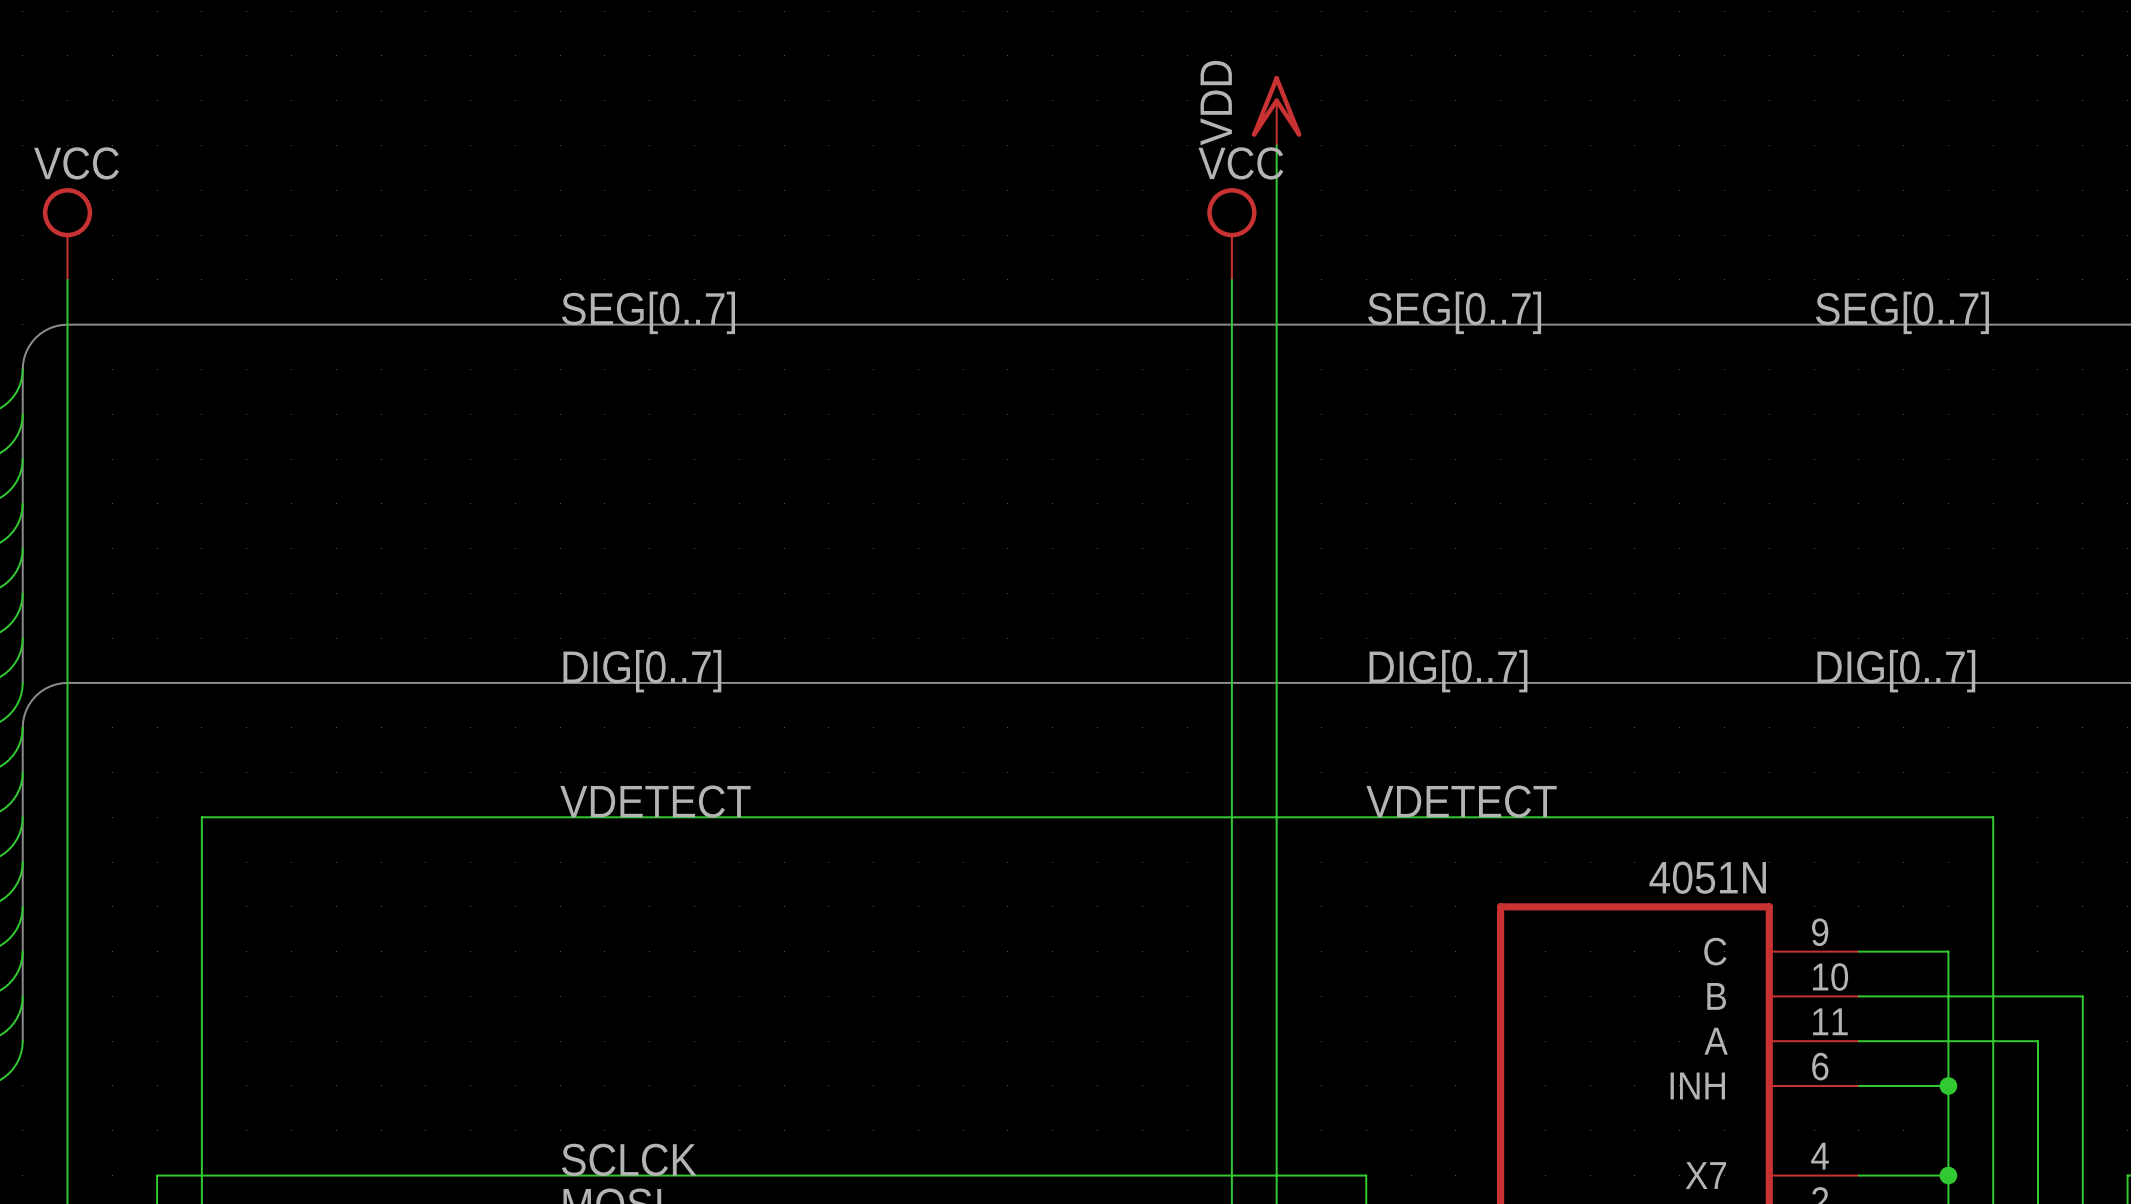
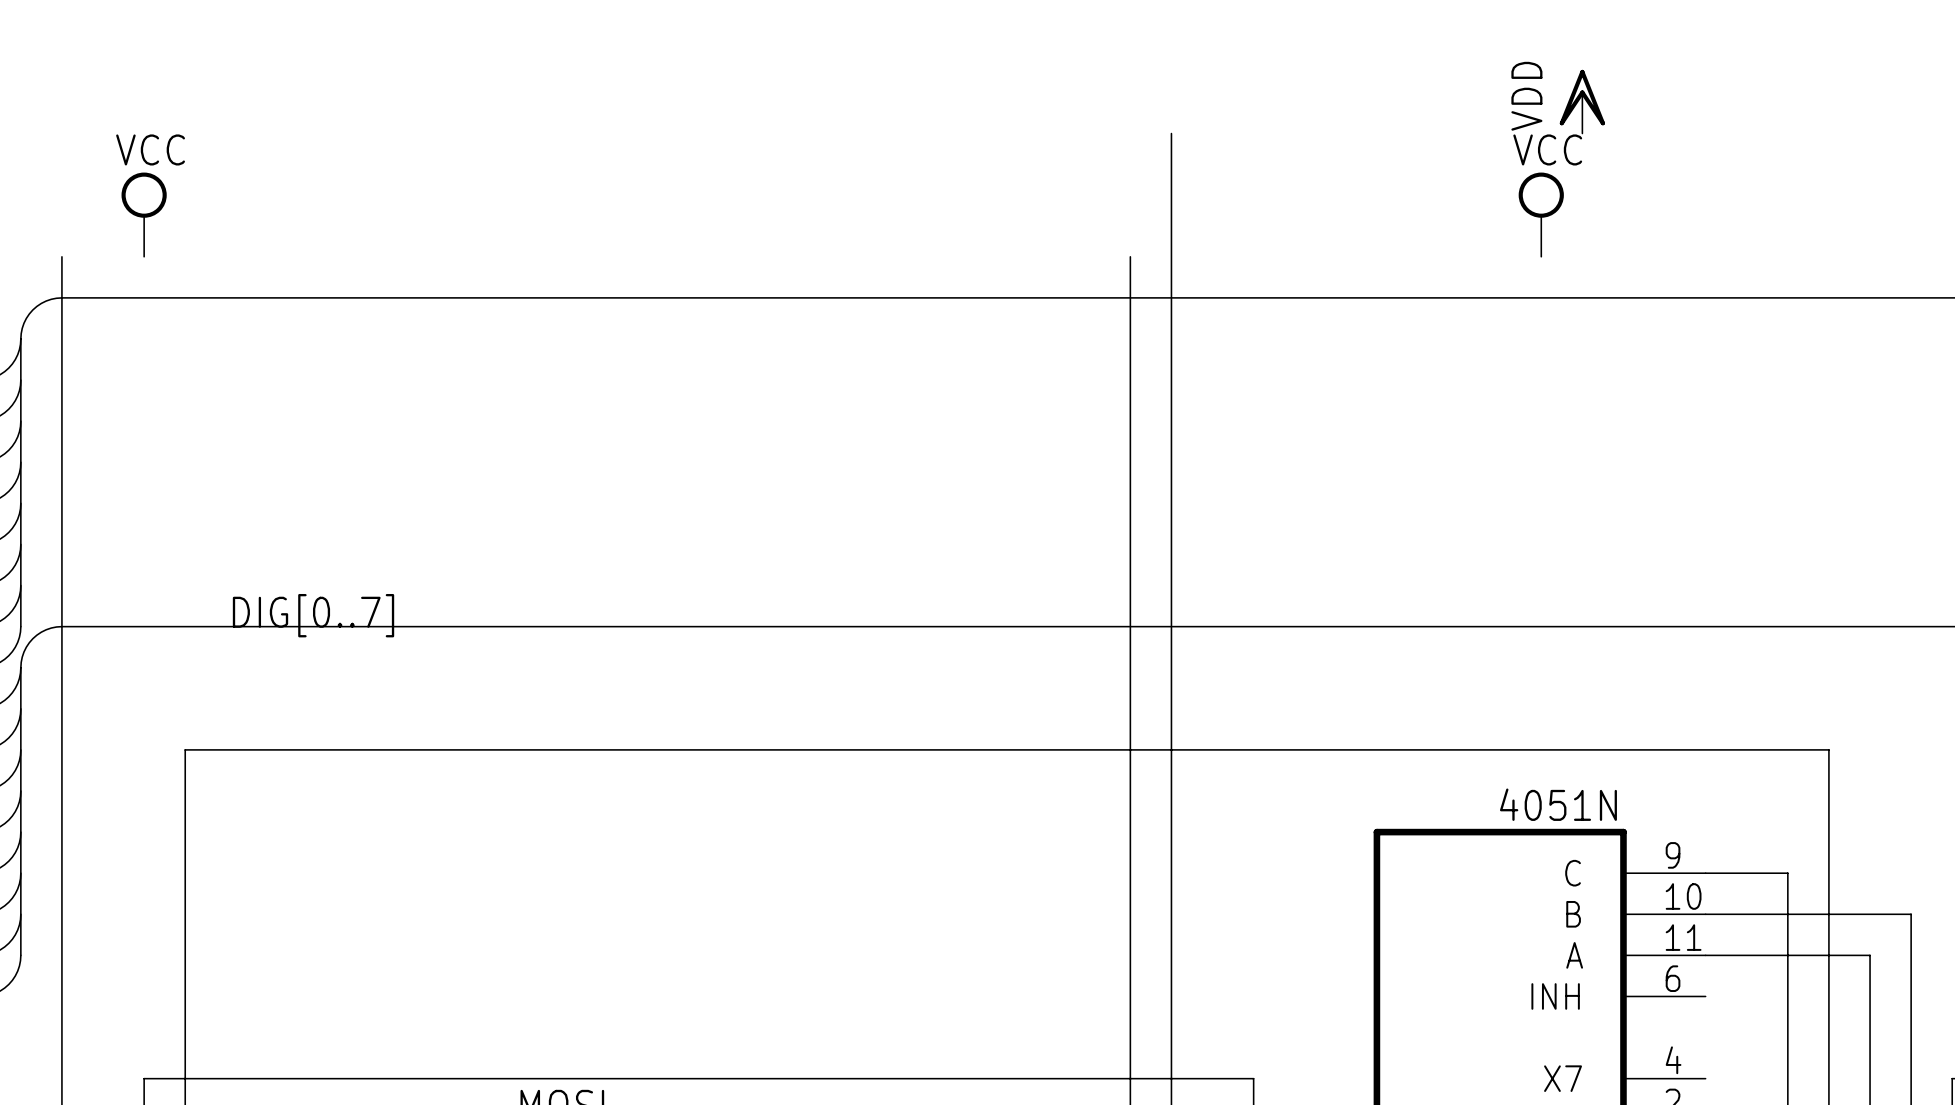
power symbol: VDD (1276, 110) -> none
power symbol: none -> VDD (1582, 101)
power symbol position: VCC (67, 233) -> VCC (144, 214)
power symbol: VCC (1231, 233) -> none
power symbol: none -> VCC (1541, 214)
label: SEG[0..7] (648, 312) -> none
label: SEG[0..7] (1454, 312) -> none
label: SEG[0..7] (1902, 312) -> none
label position: DIG[0..7] (642, 671) -> DIG[0..7] (313, 615)
label: DIG[0..7] (1448, 671) -> none
label: DIG[0..7] (1896, 671) -> none
label: VDETECT (655, 801) -> none
label: VDETECT (1461, 801) -> none
wire: (1858, 1085) (1948, 1085) -> none
junction: (1948, 1085) -> none
label: SCLCK (629, 1159) -> none
wire: (1858, 1175) (1948, 1175) -> none
junction: (1948, 1175) -> none

